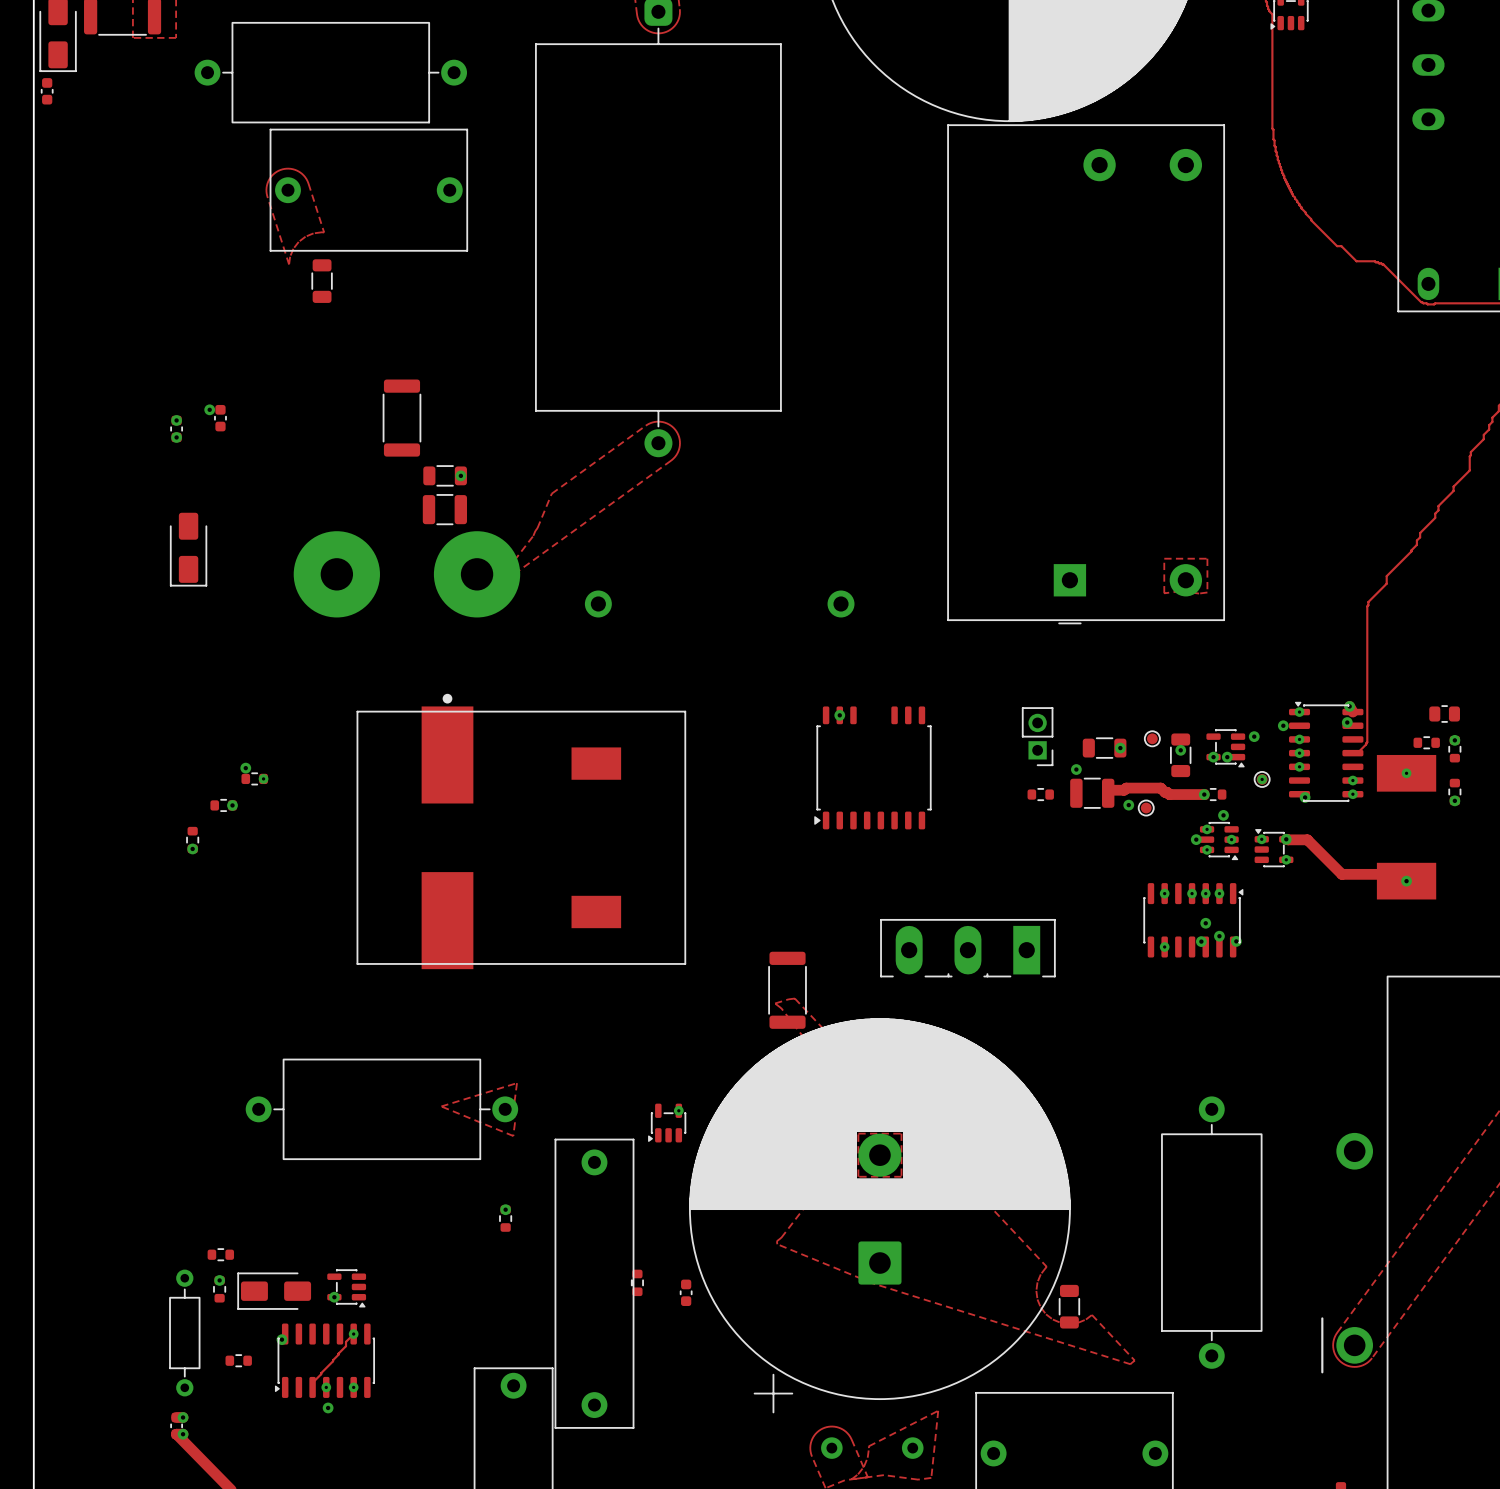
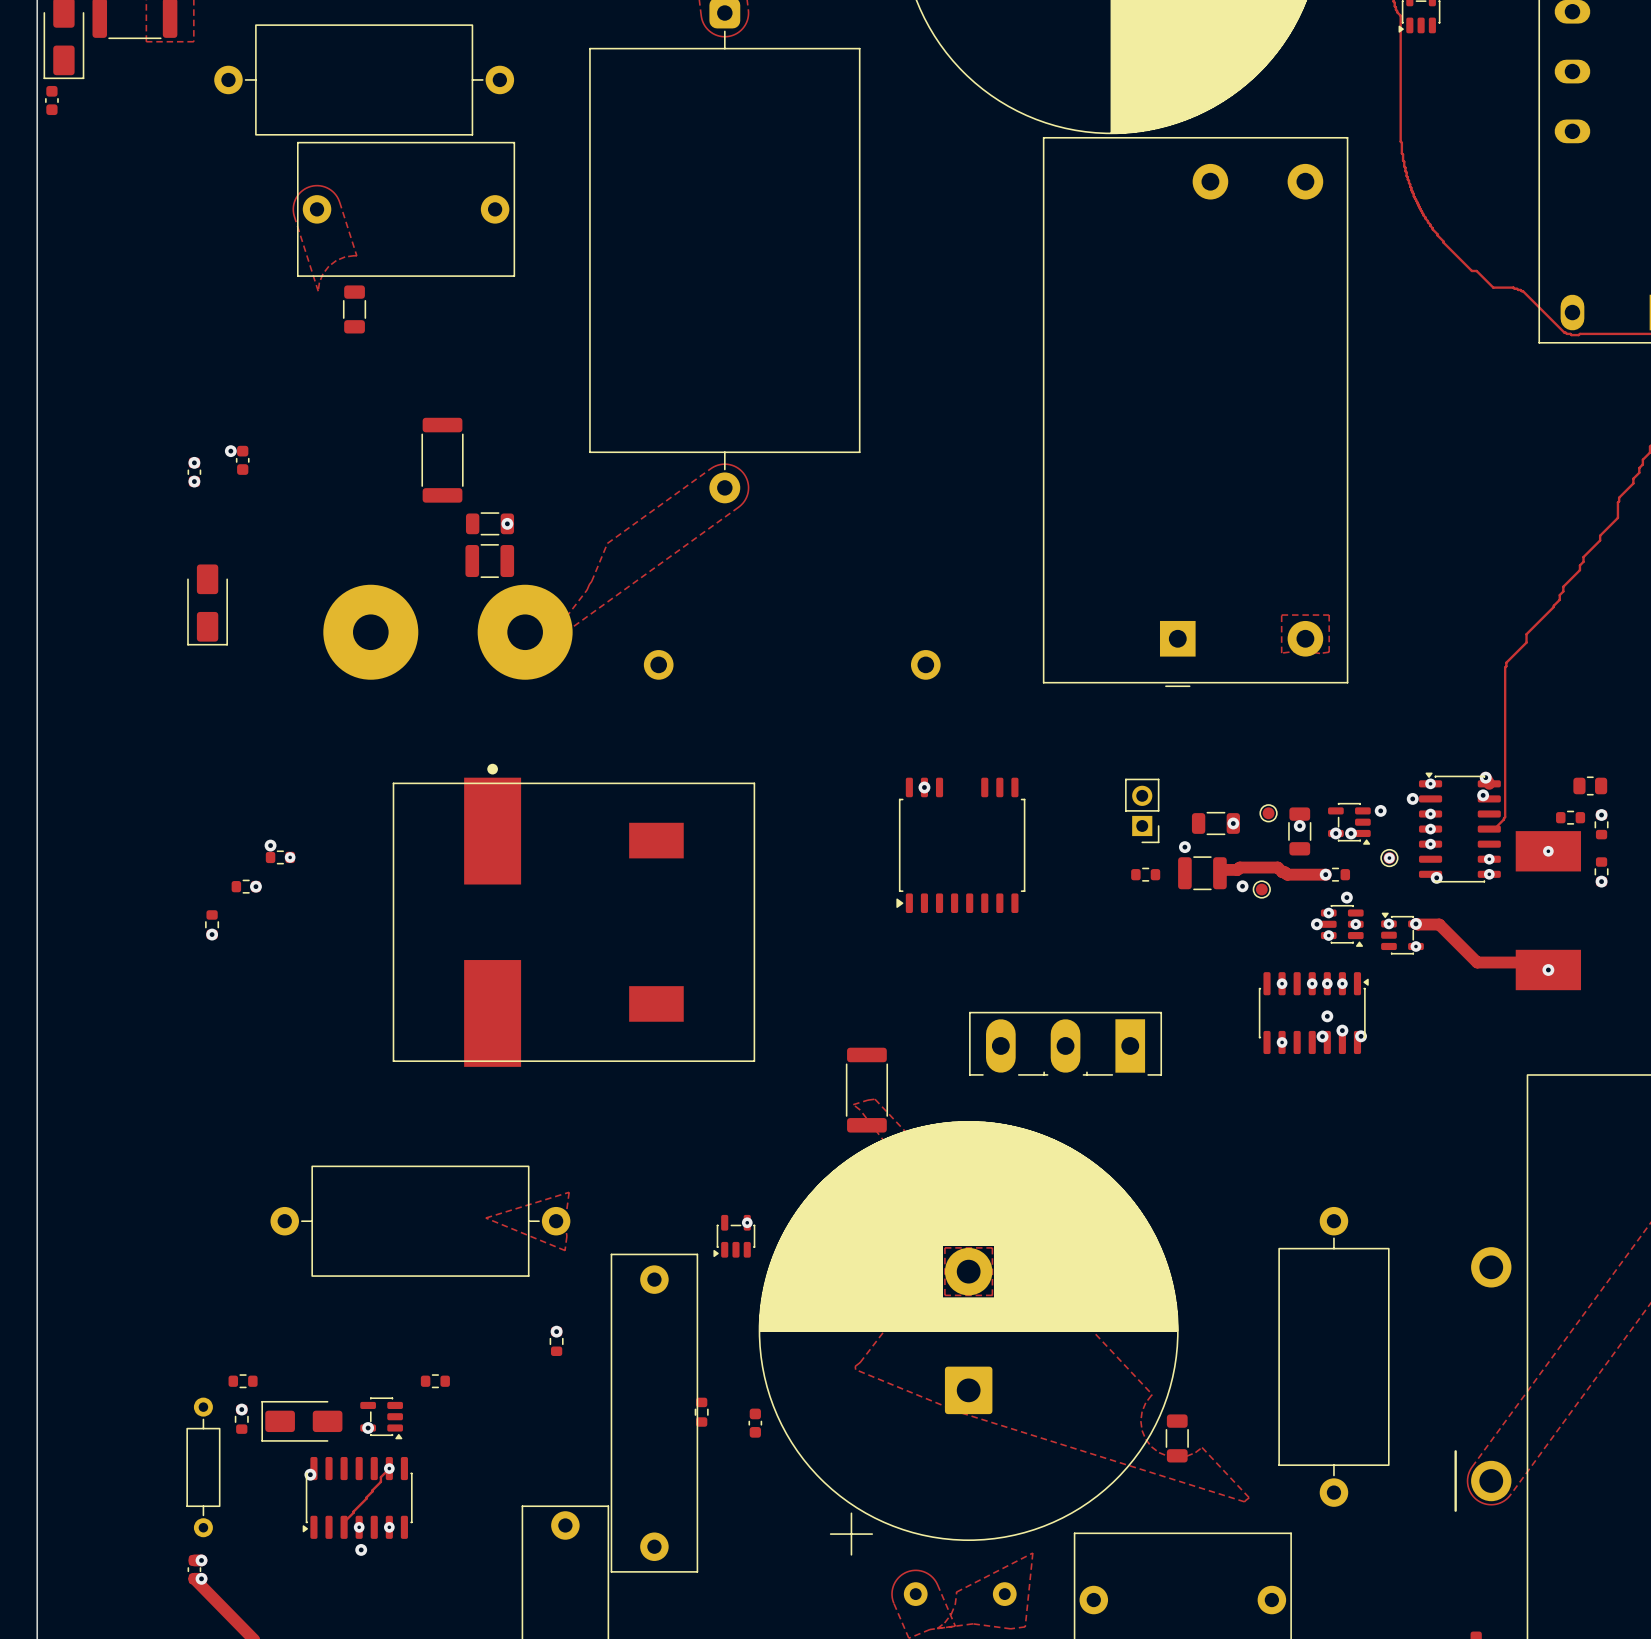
part position: (238, 1360) -> (435, 1381)

